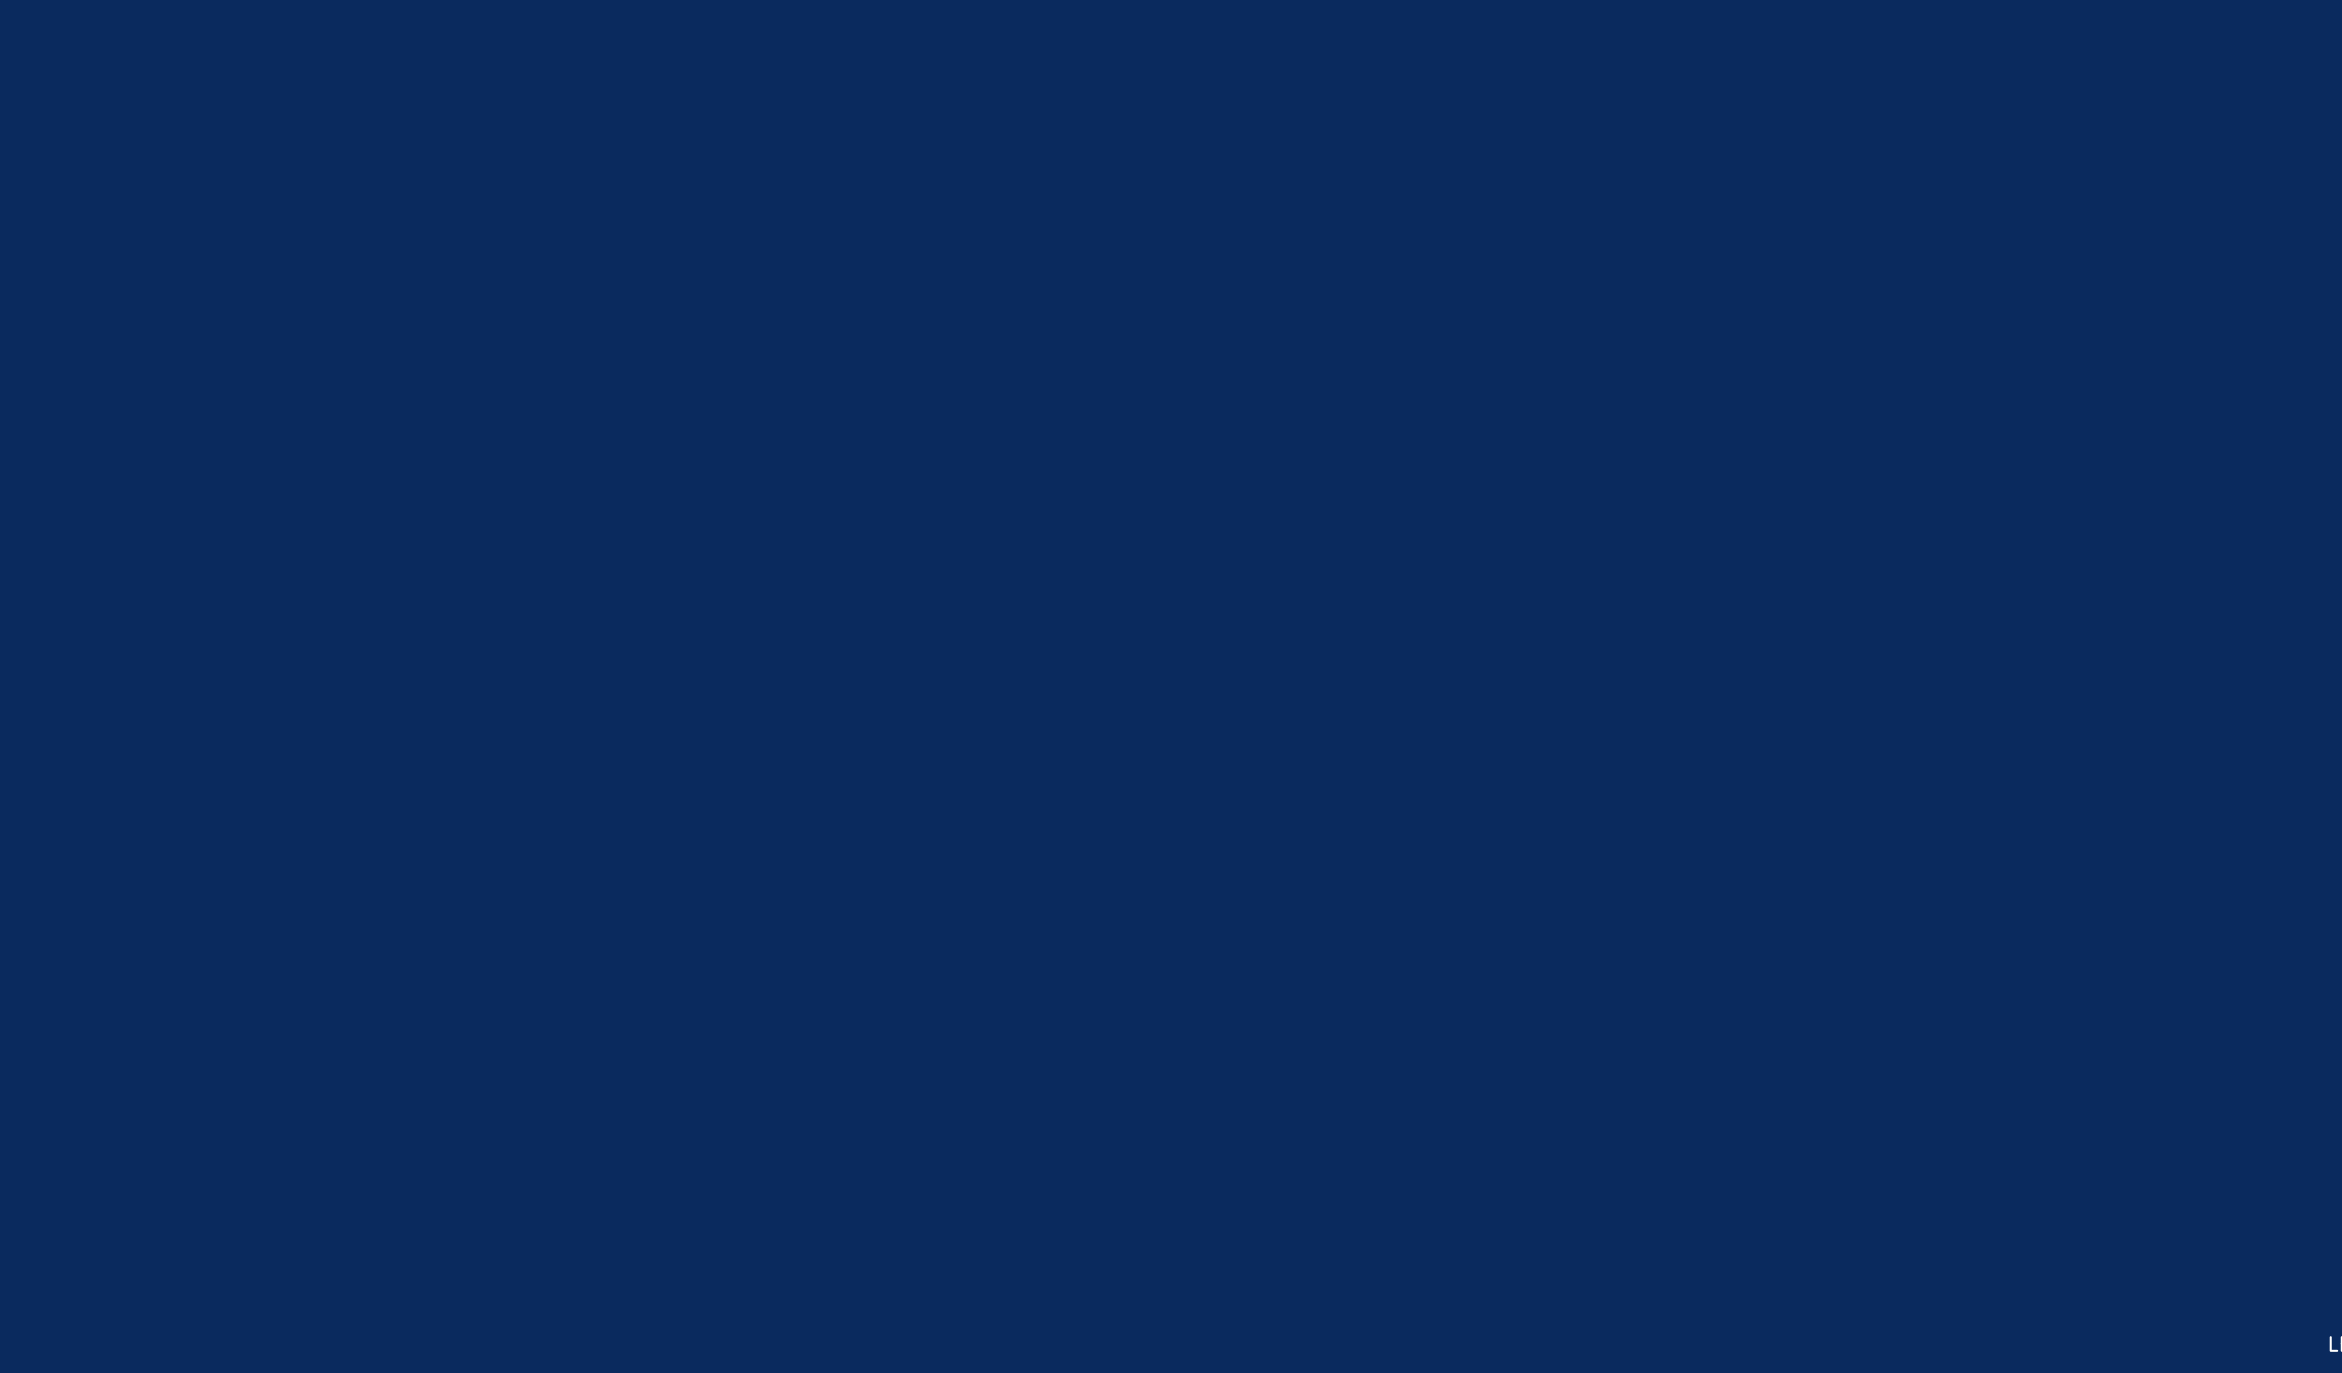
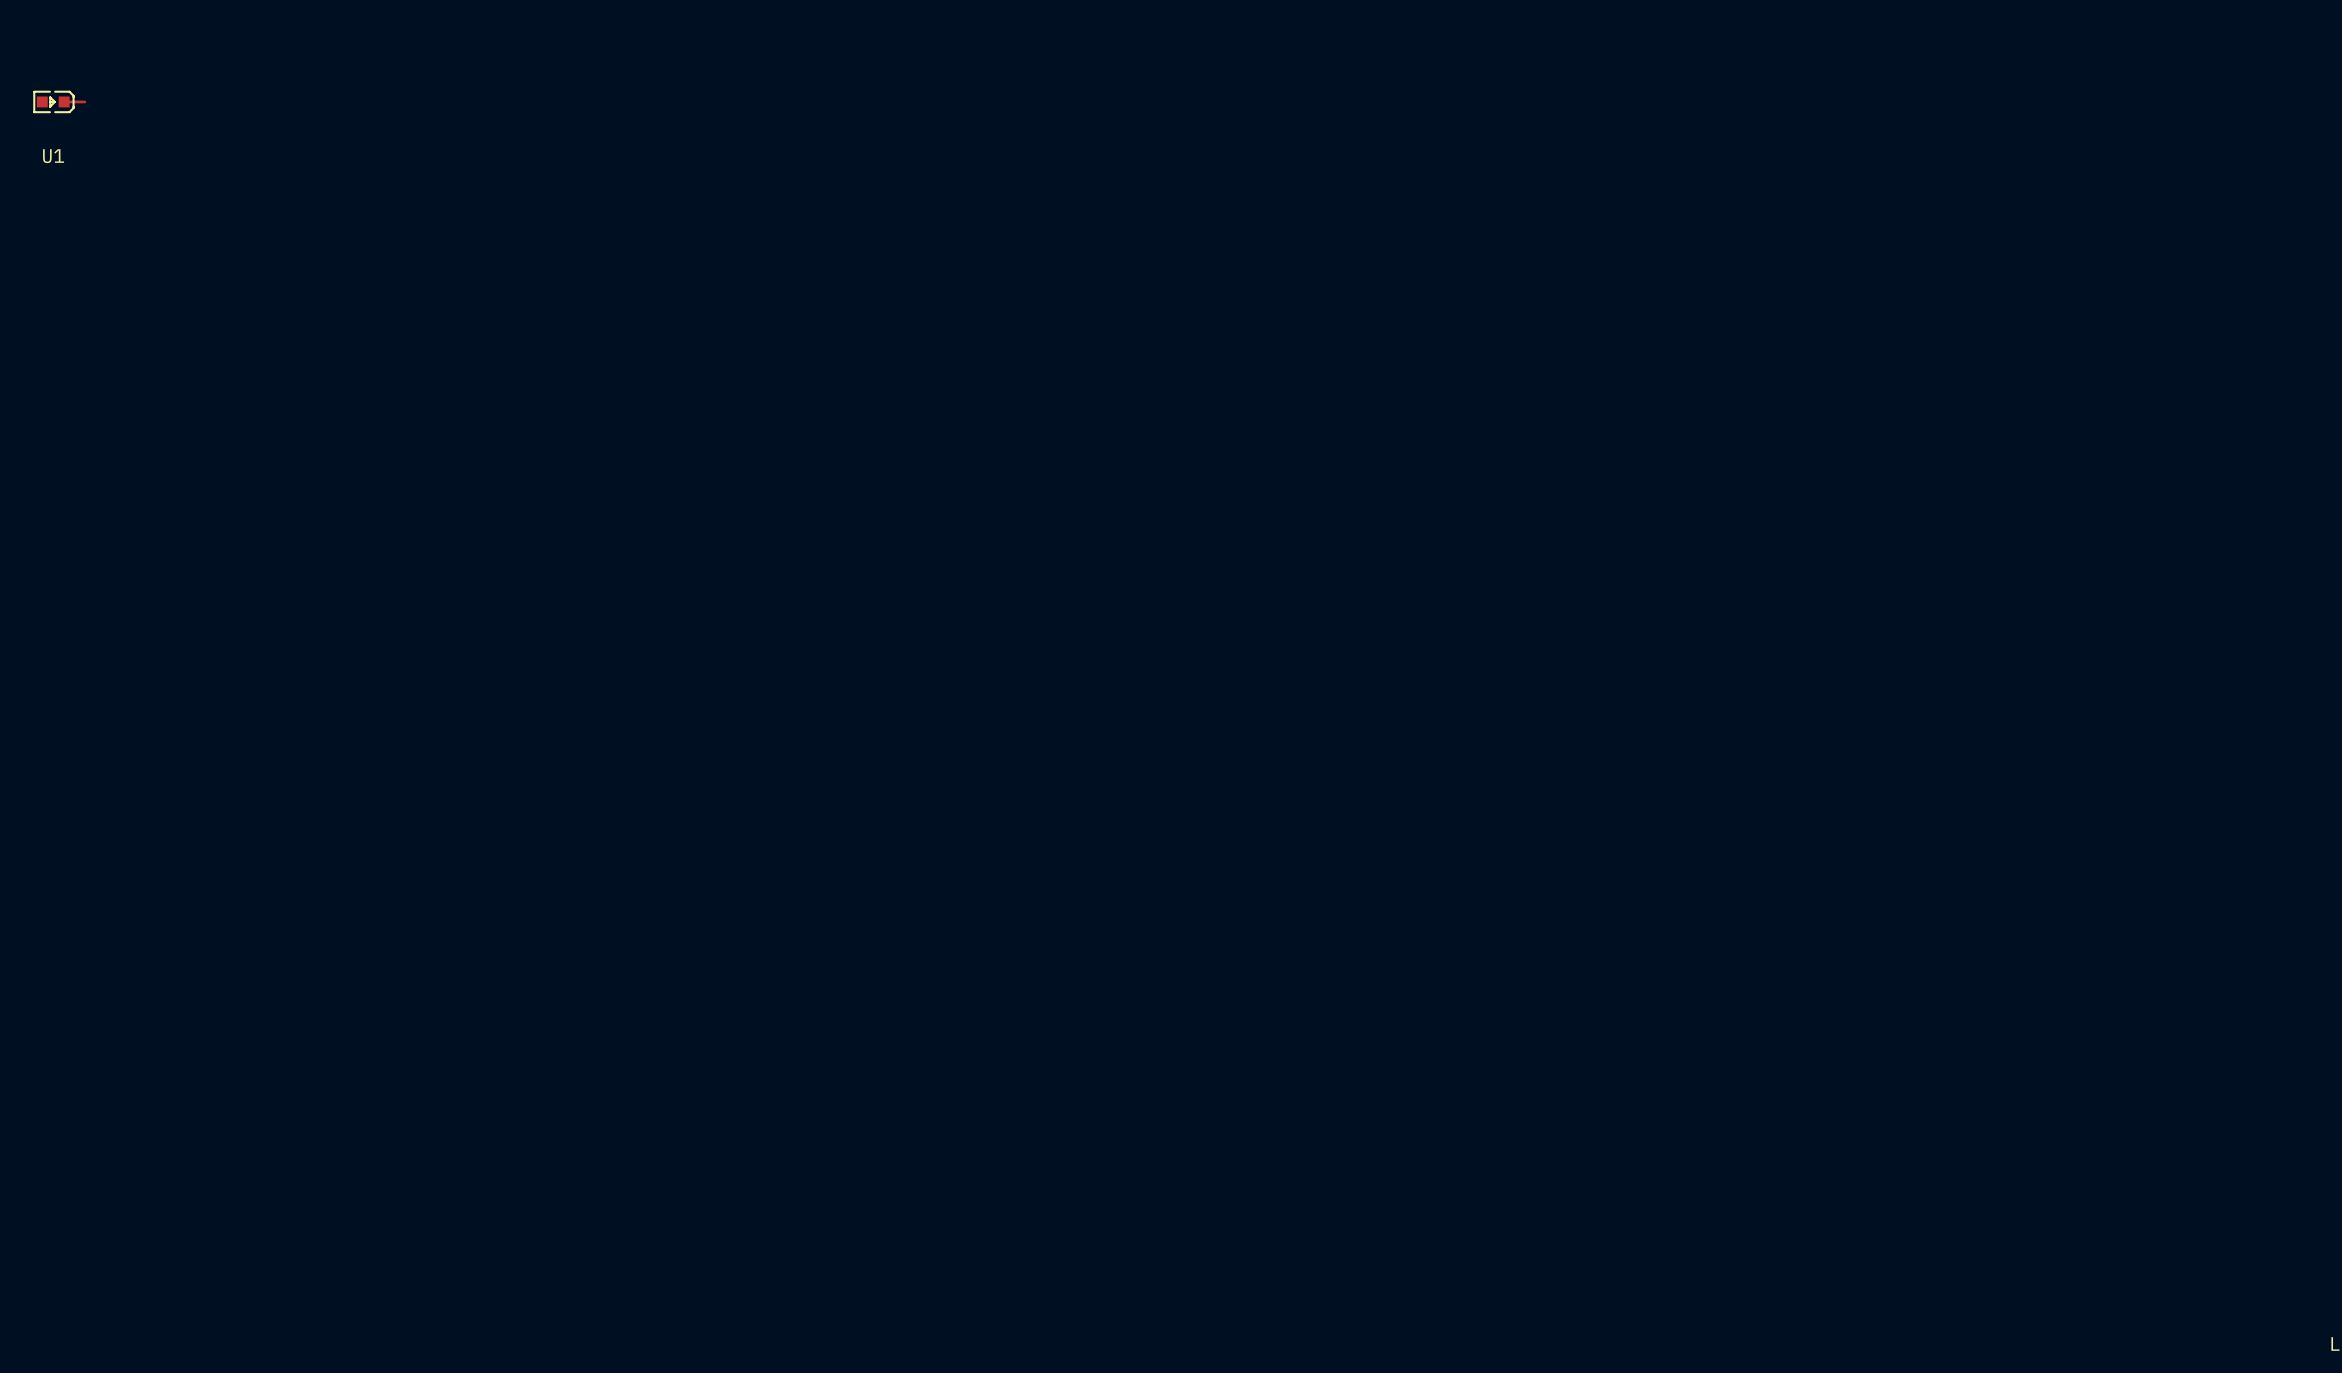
U1: none -> (53, 101)
track: none -> (64, 101) (84, 101)

